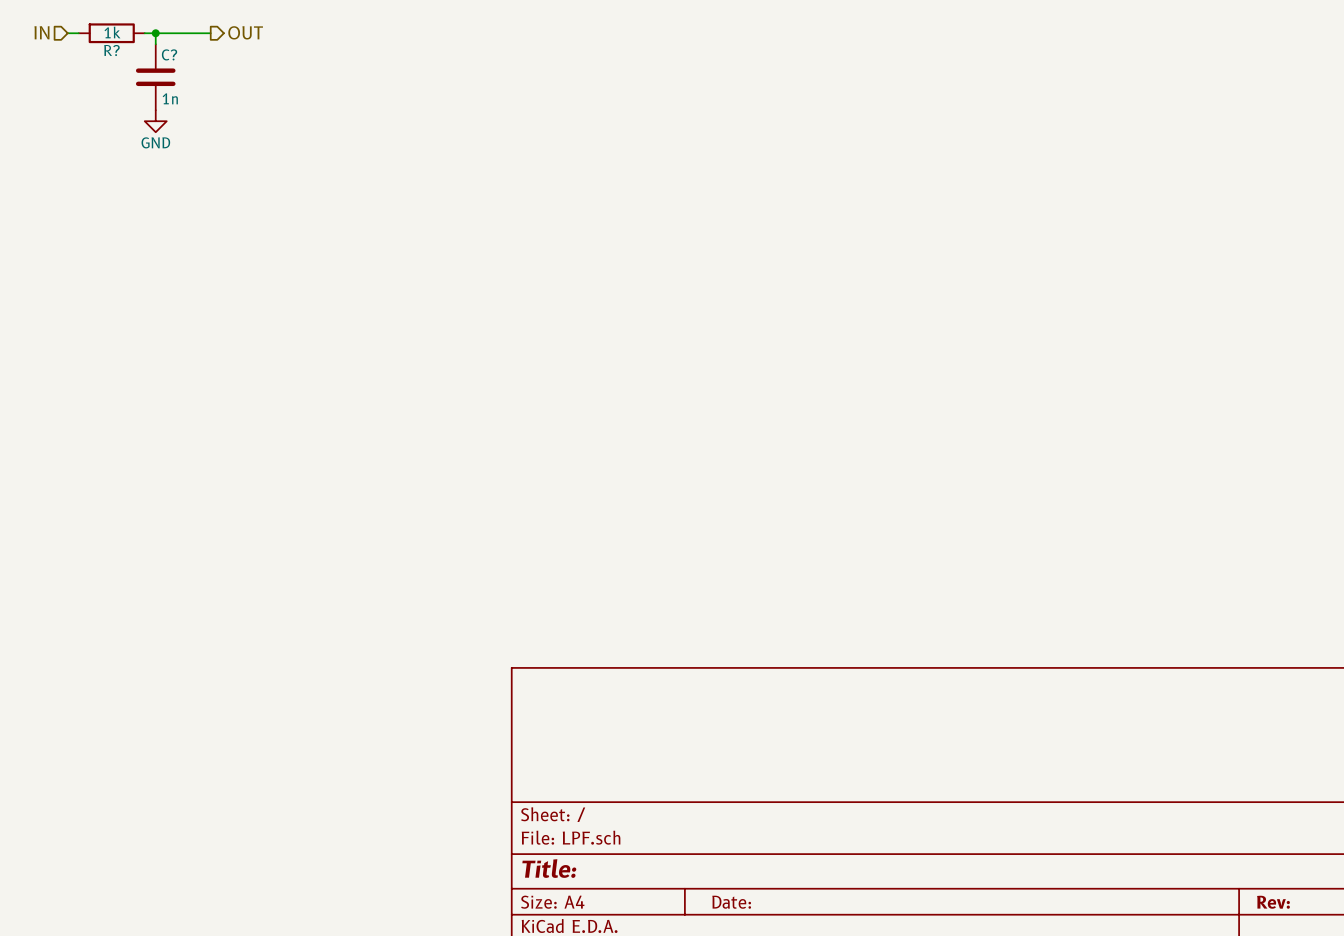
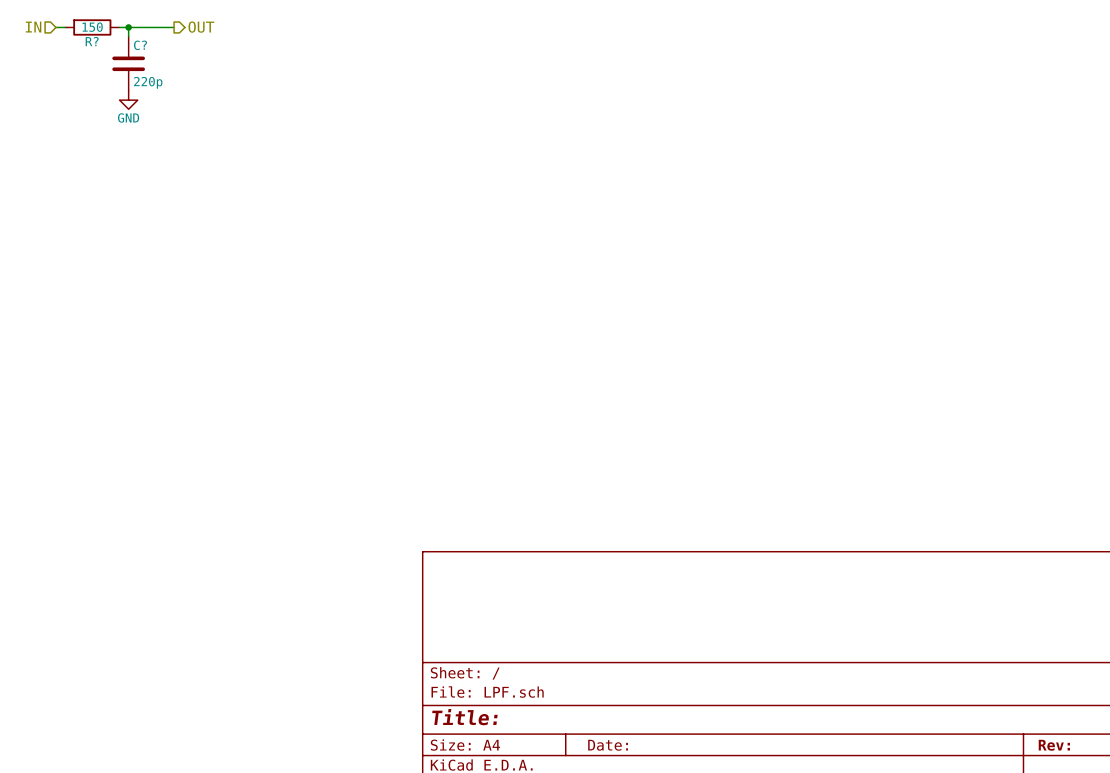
R? value: 1k (112, 32) -> 150 (92, 27)
C? value: 1n (170, 98) -> 220p (148, 82)

